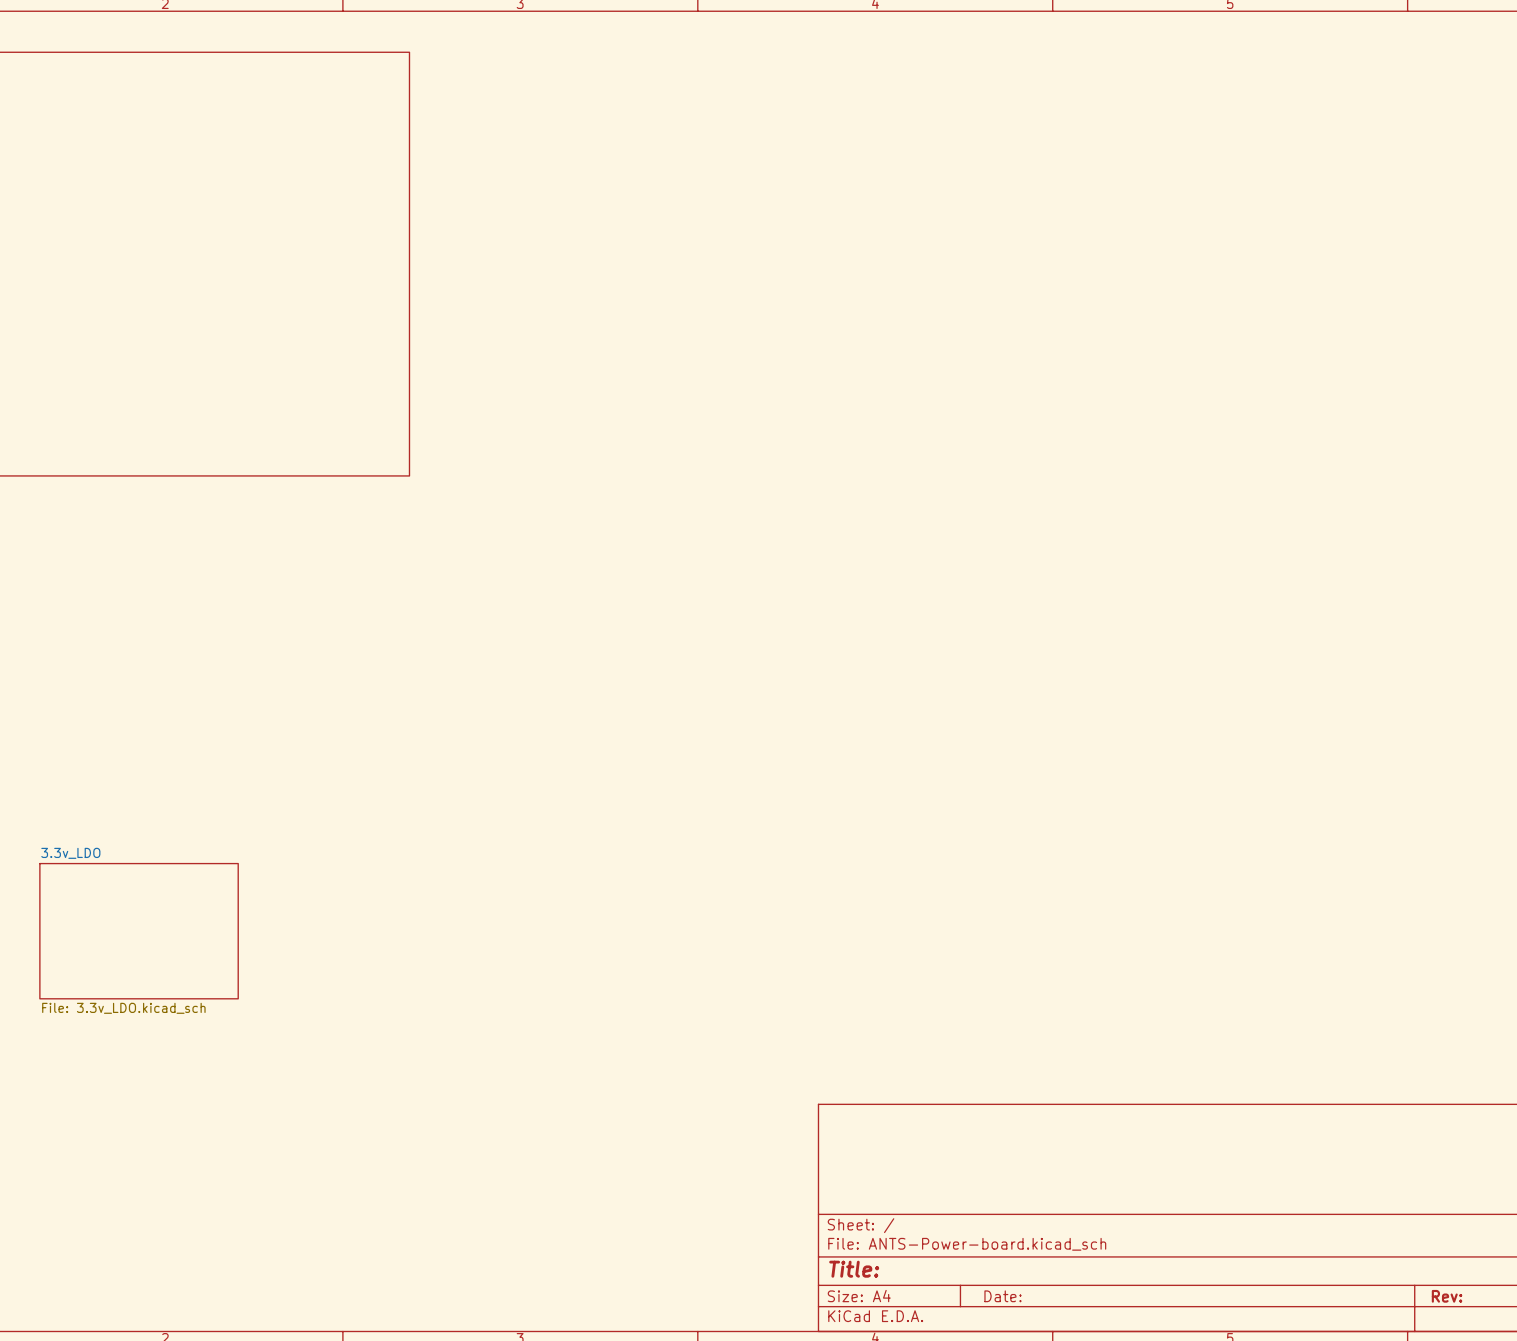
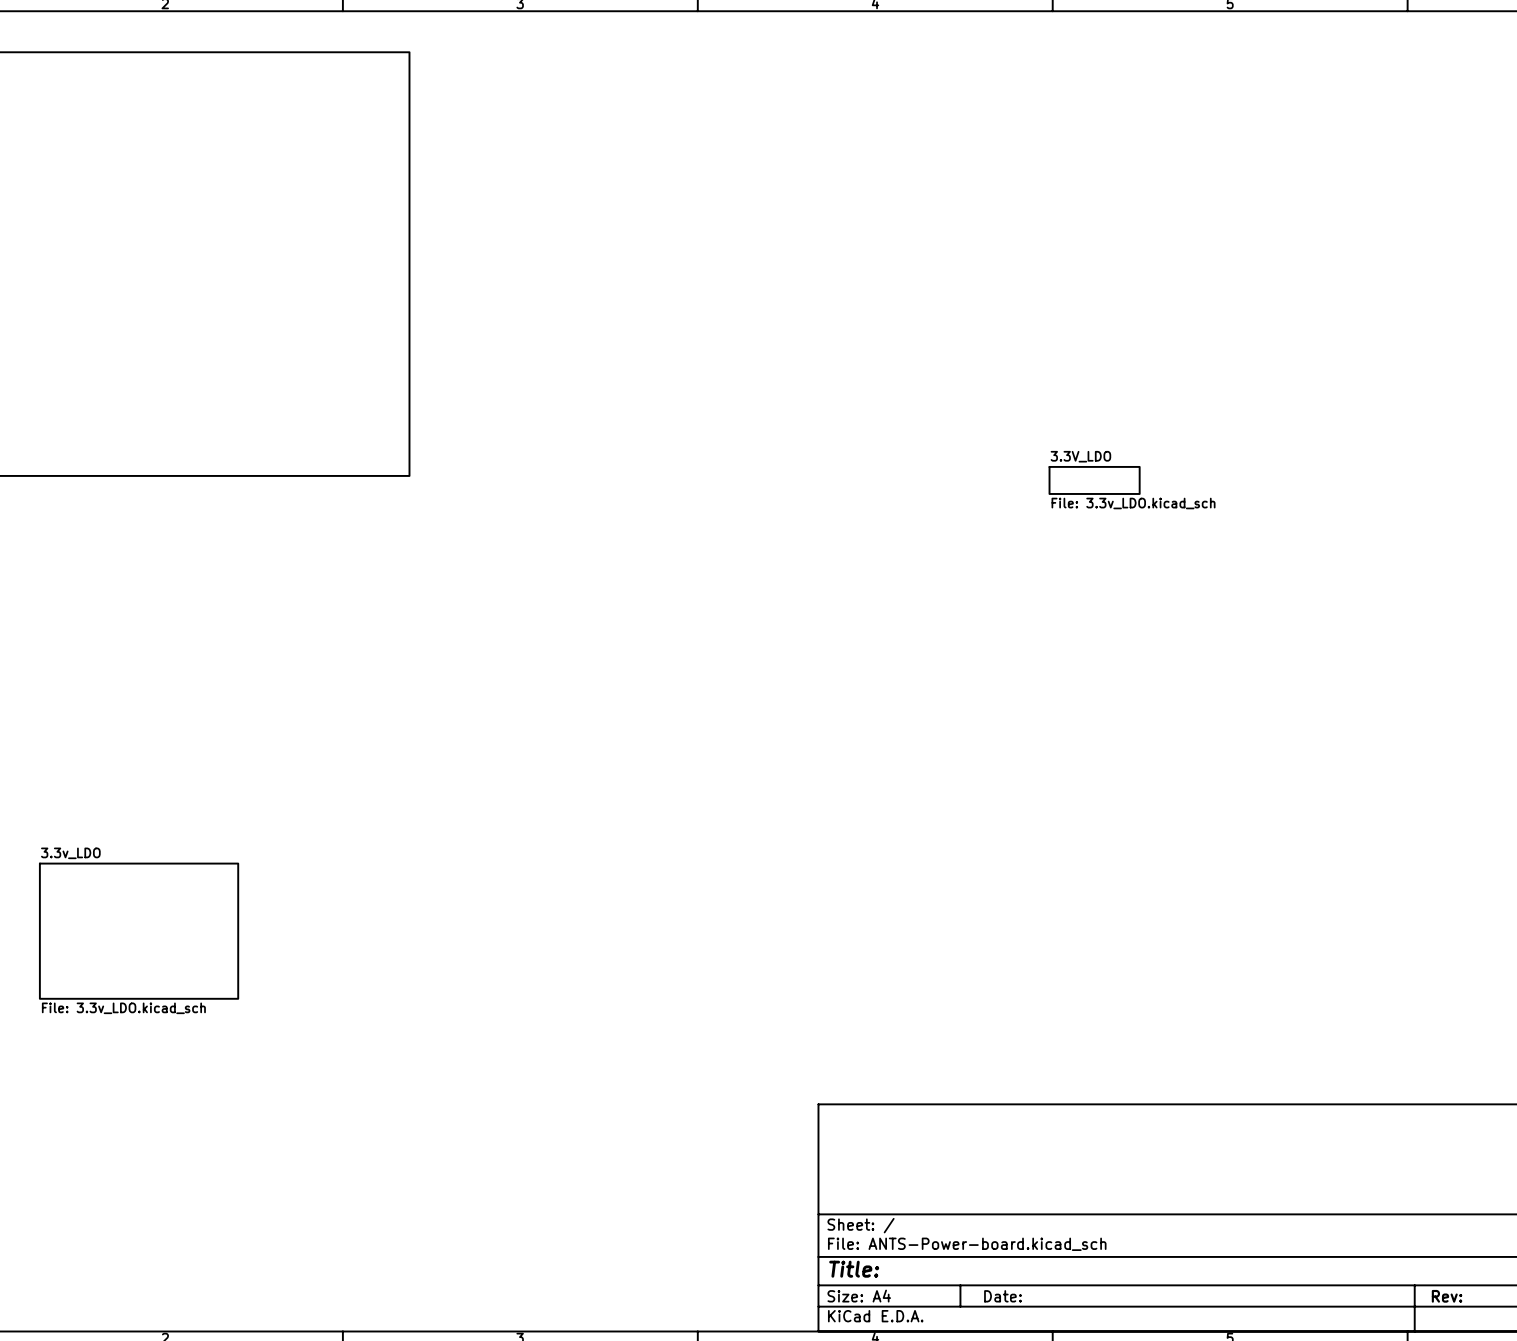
sheet 3.3V_LDO: none -> File: 3.3v_LDO.kicad_sch (1094, 480)

